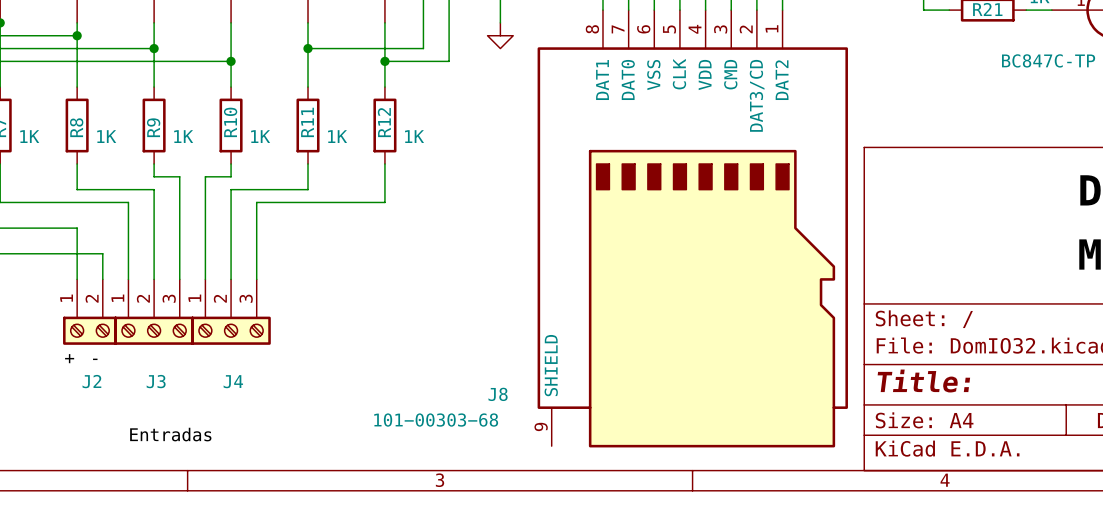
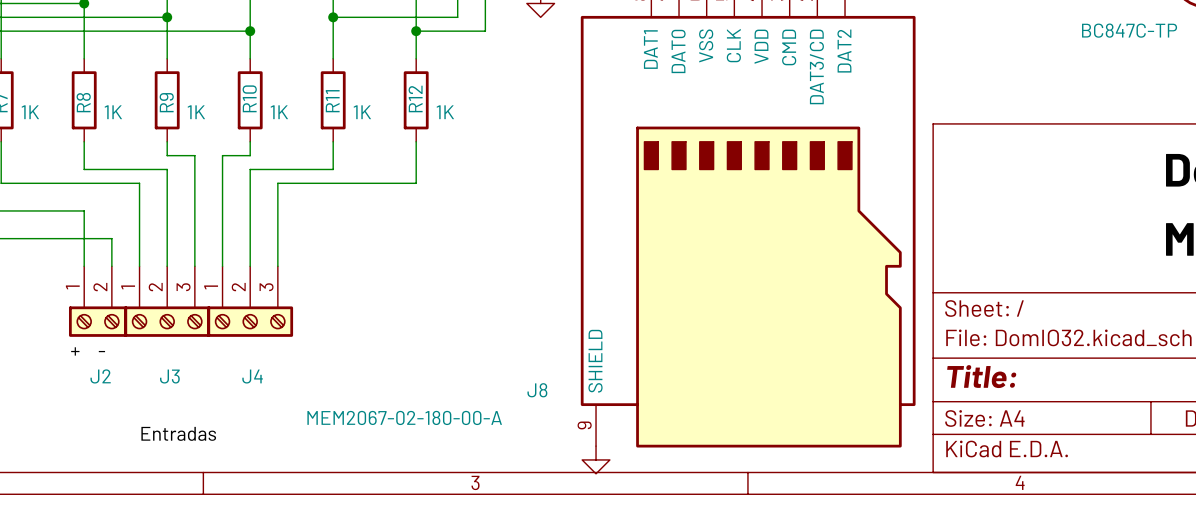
J8 value: 101−00303−68 (436, 420) -> MEM2067-02-180-00-A (404, 417)
power symbol: none -> (596, 459)

